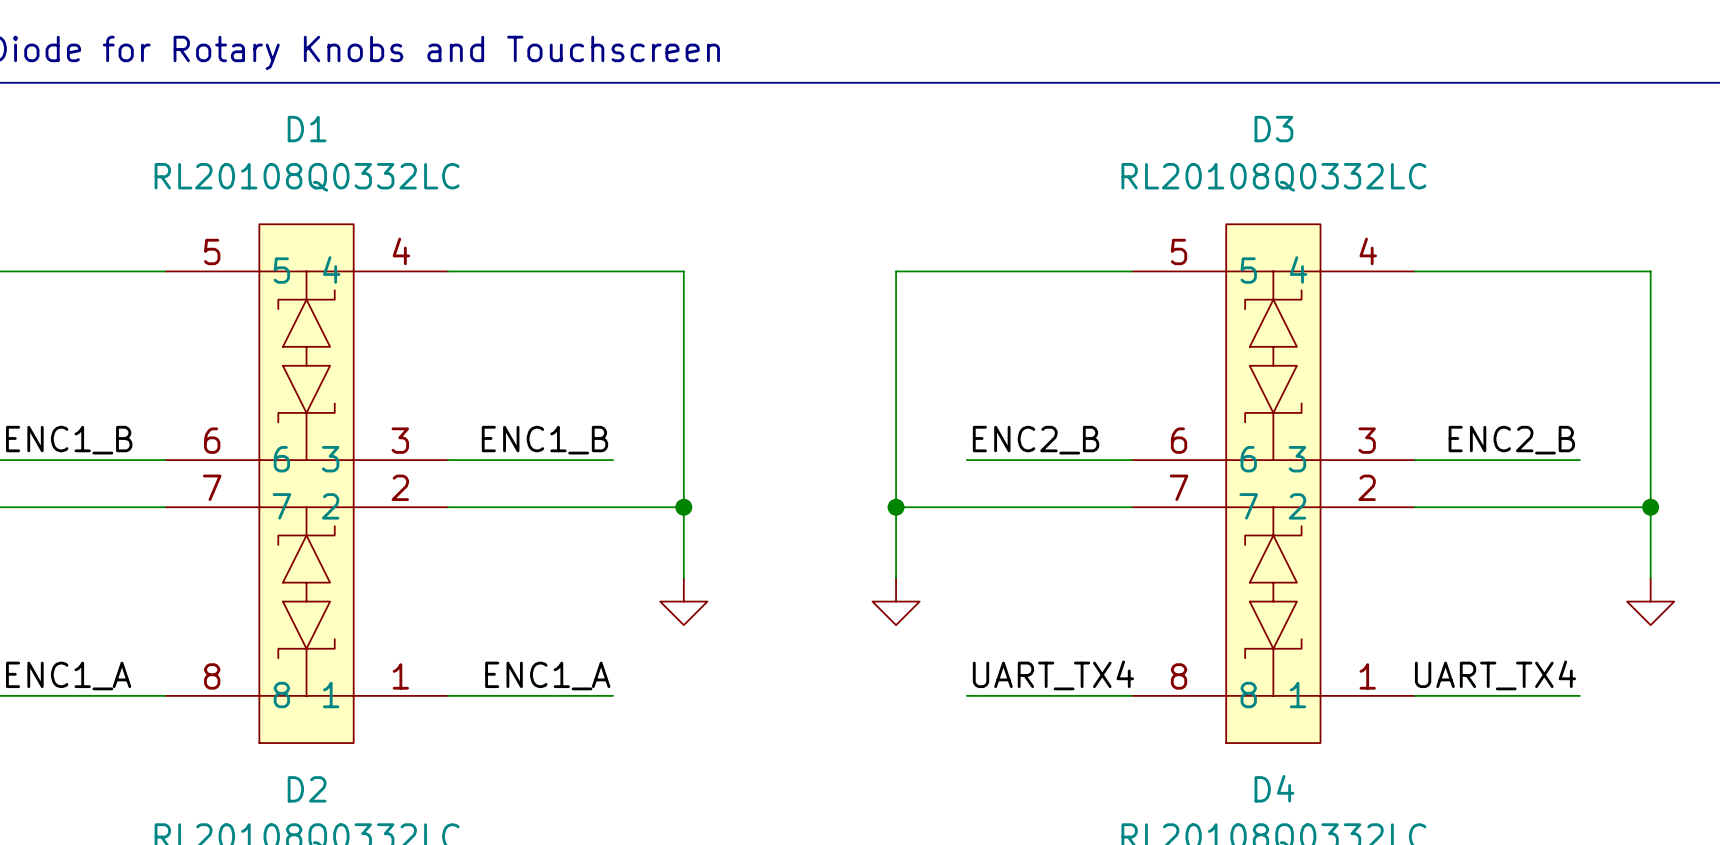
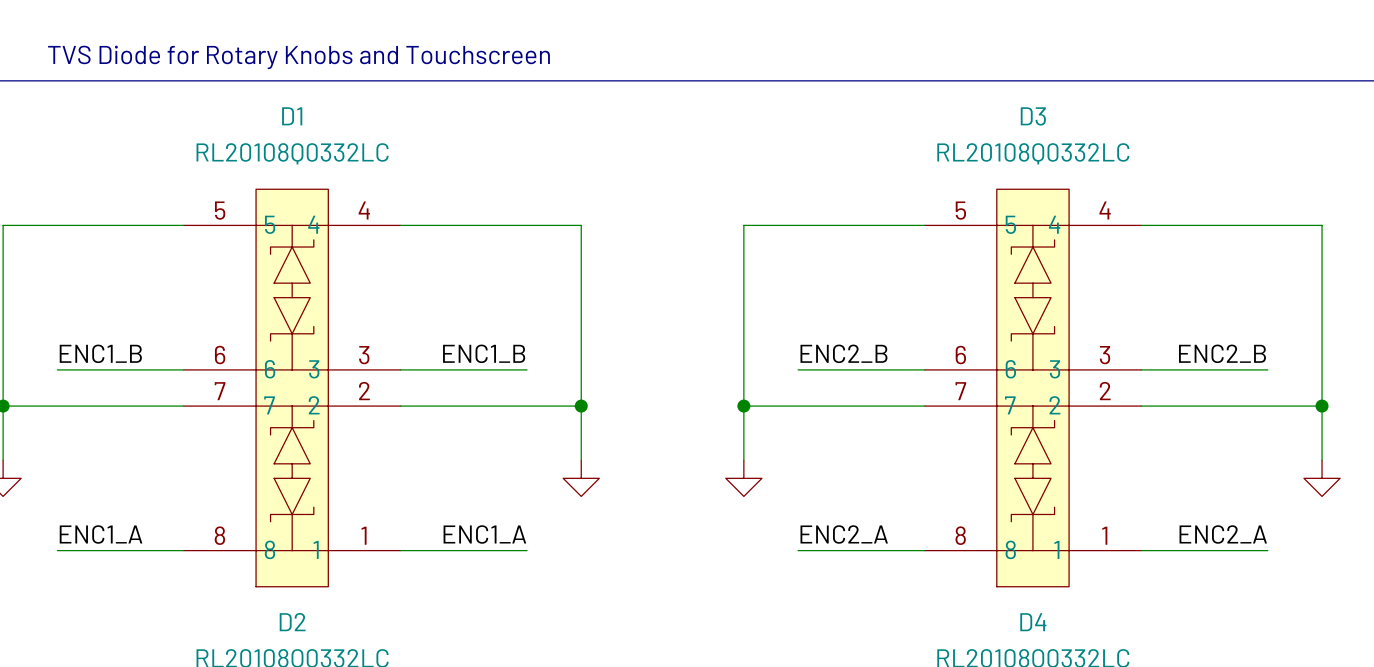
label: UART_TX4 (1053, 675) -> ENC2_A (844, 534)
label: UART_TX4 (1495, 675) -> ENC2_A (1223, 534)

